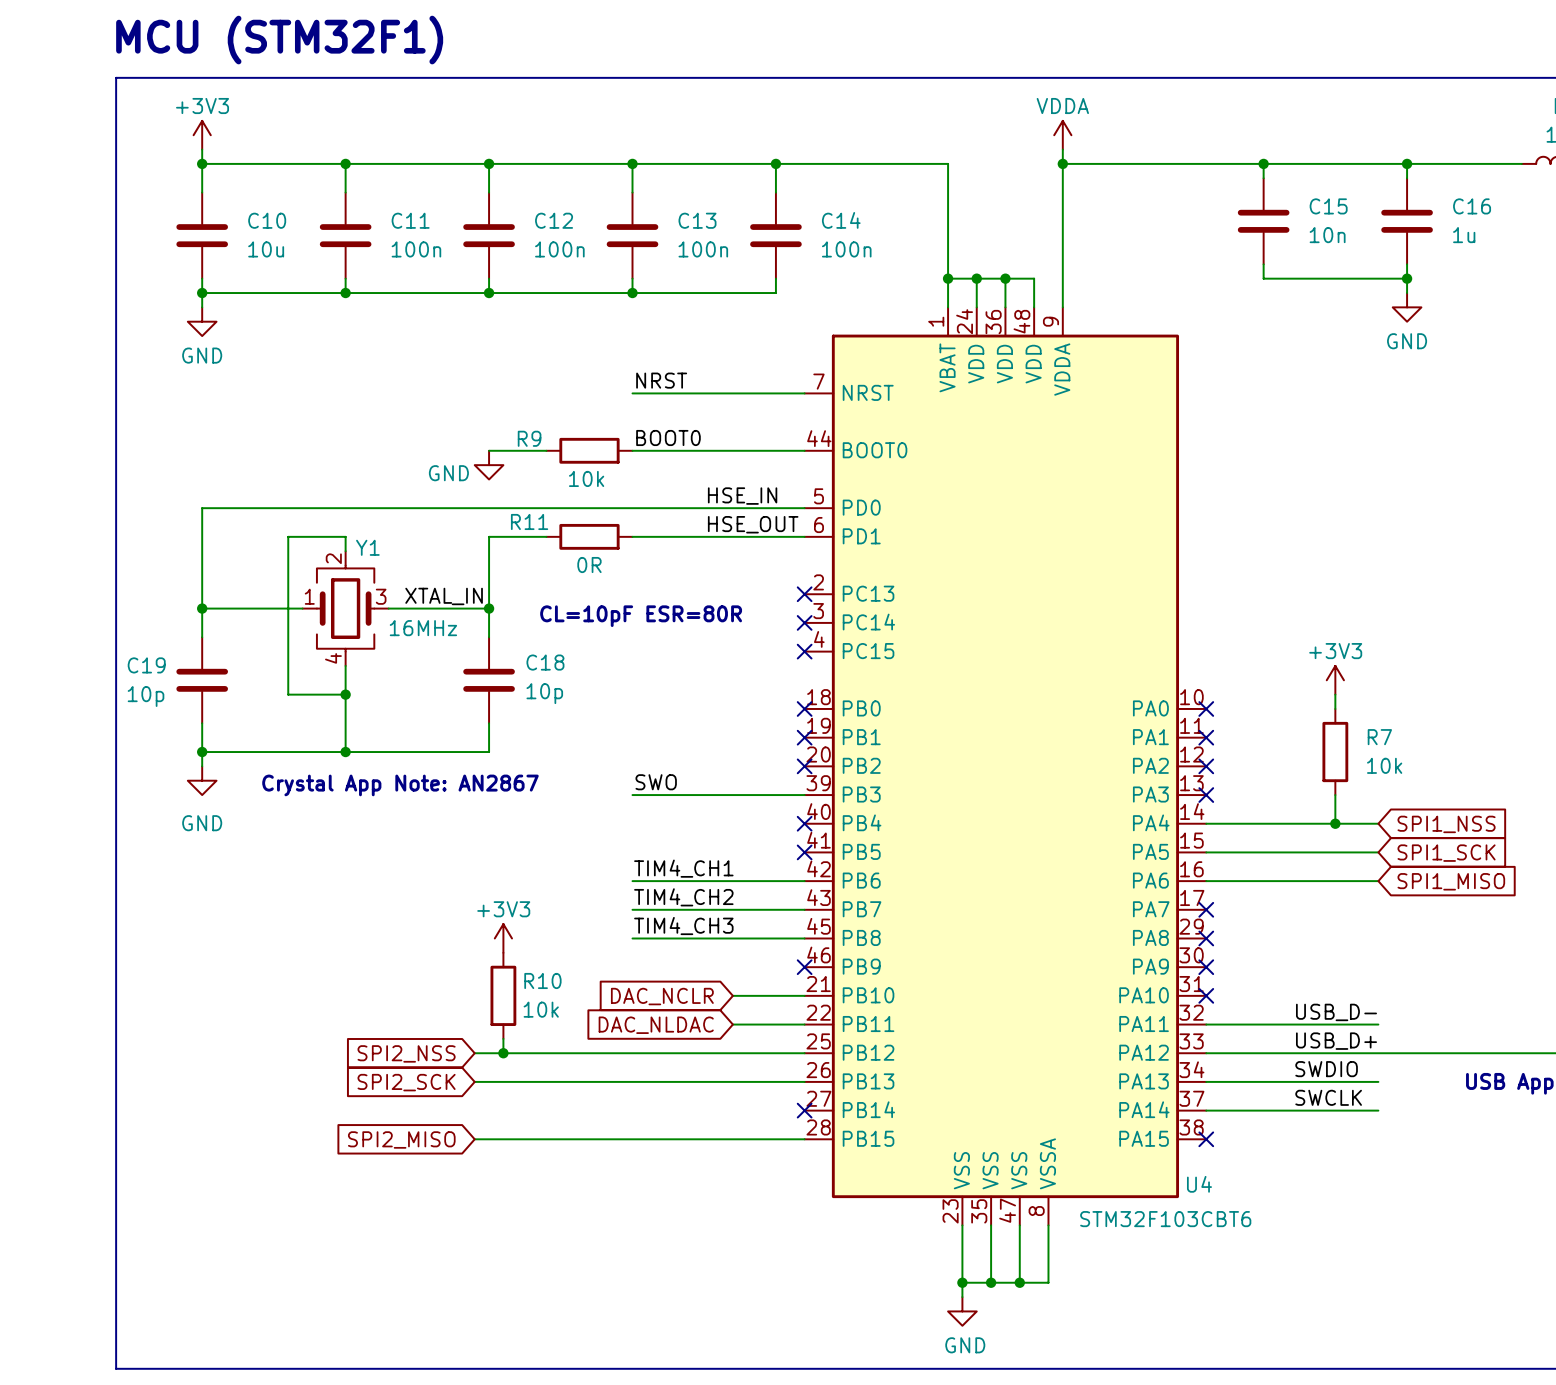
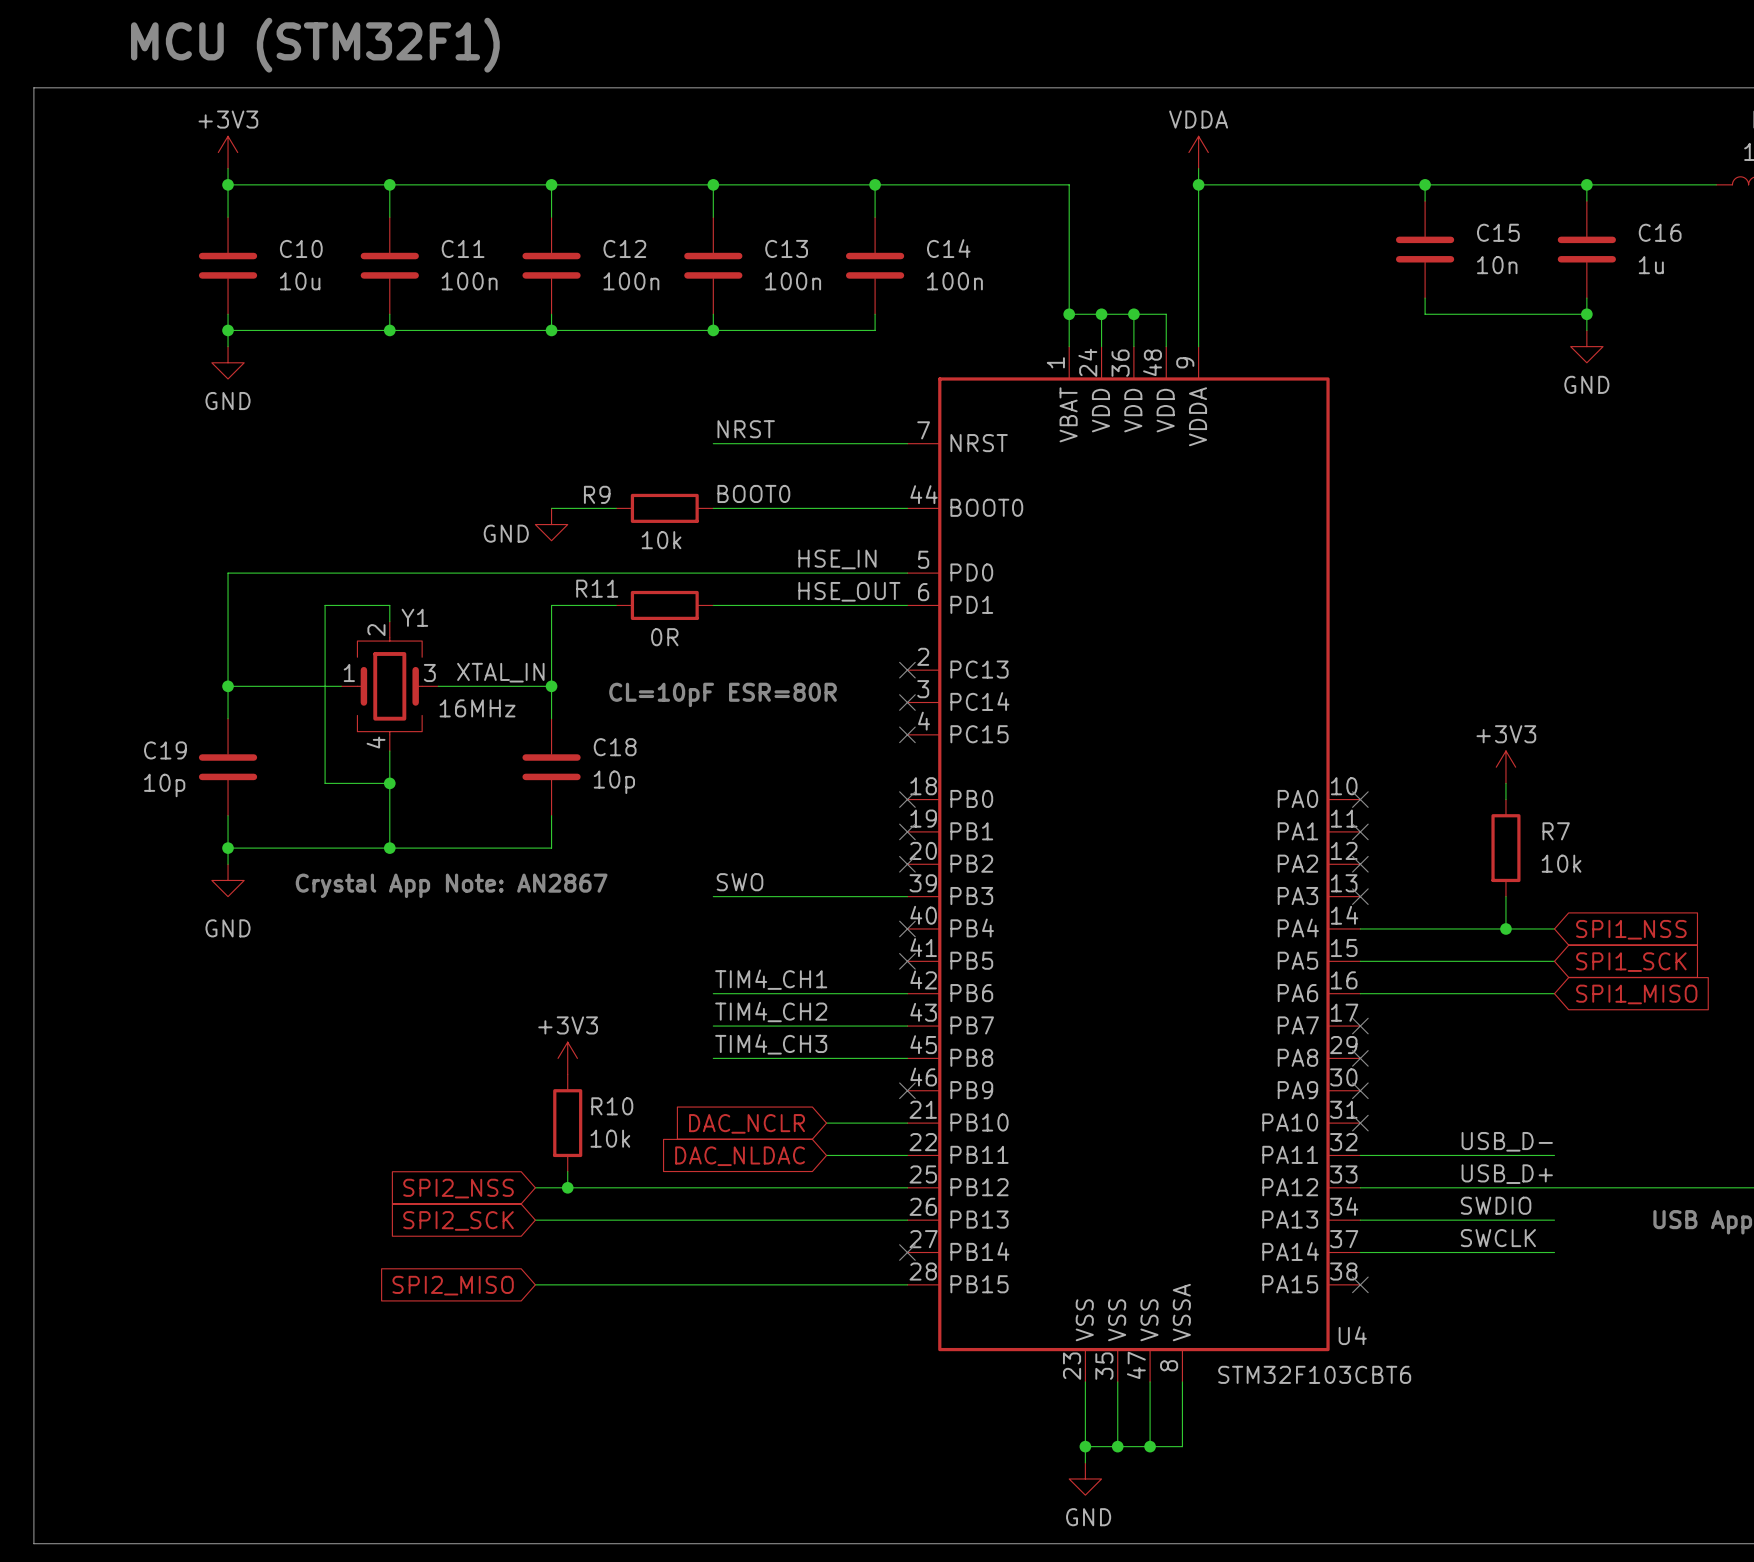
line: (116, 77) (116, 1368) -> (130, 87) (33, 87) (33, 1543) (130, 1543)

